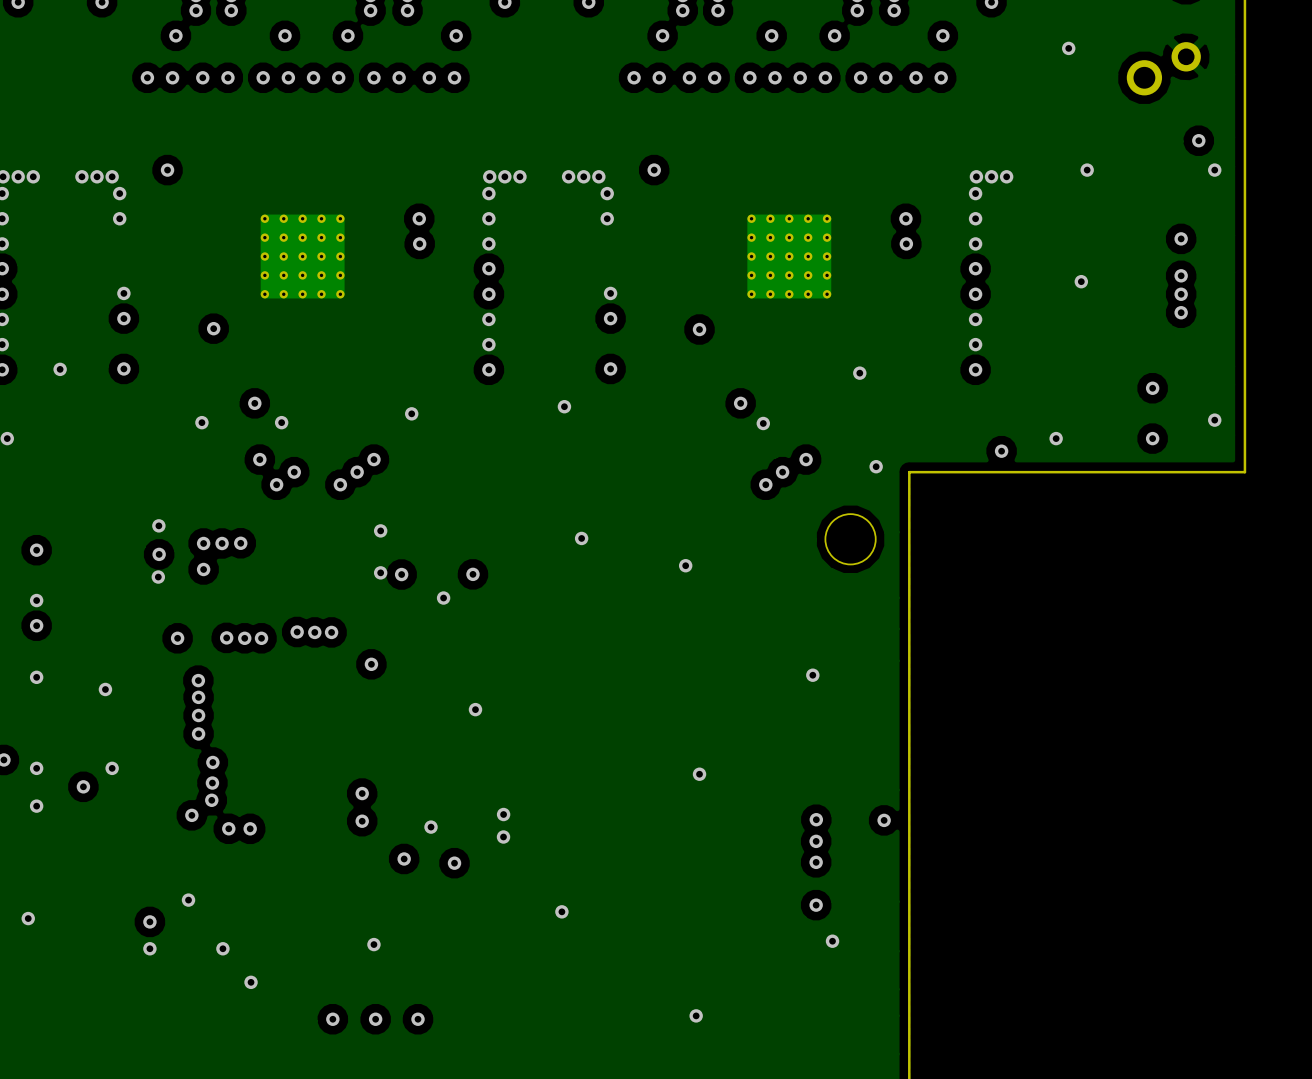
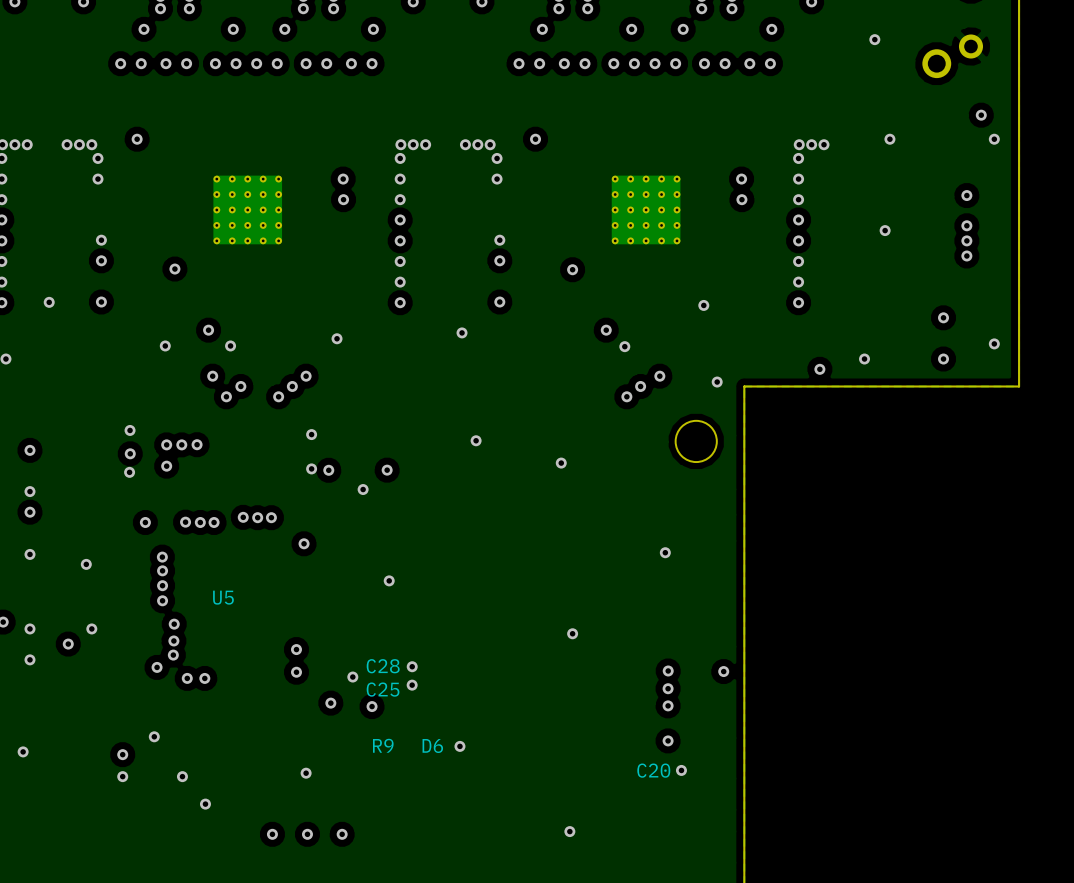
U5: none -> (223, 597)
C28: none -> (383, 666)
C25: none -> (383, 689)
R9: none -> (383, 745)
D6: none -> (432, 746)
C20: none -> (653, 770)

